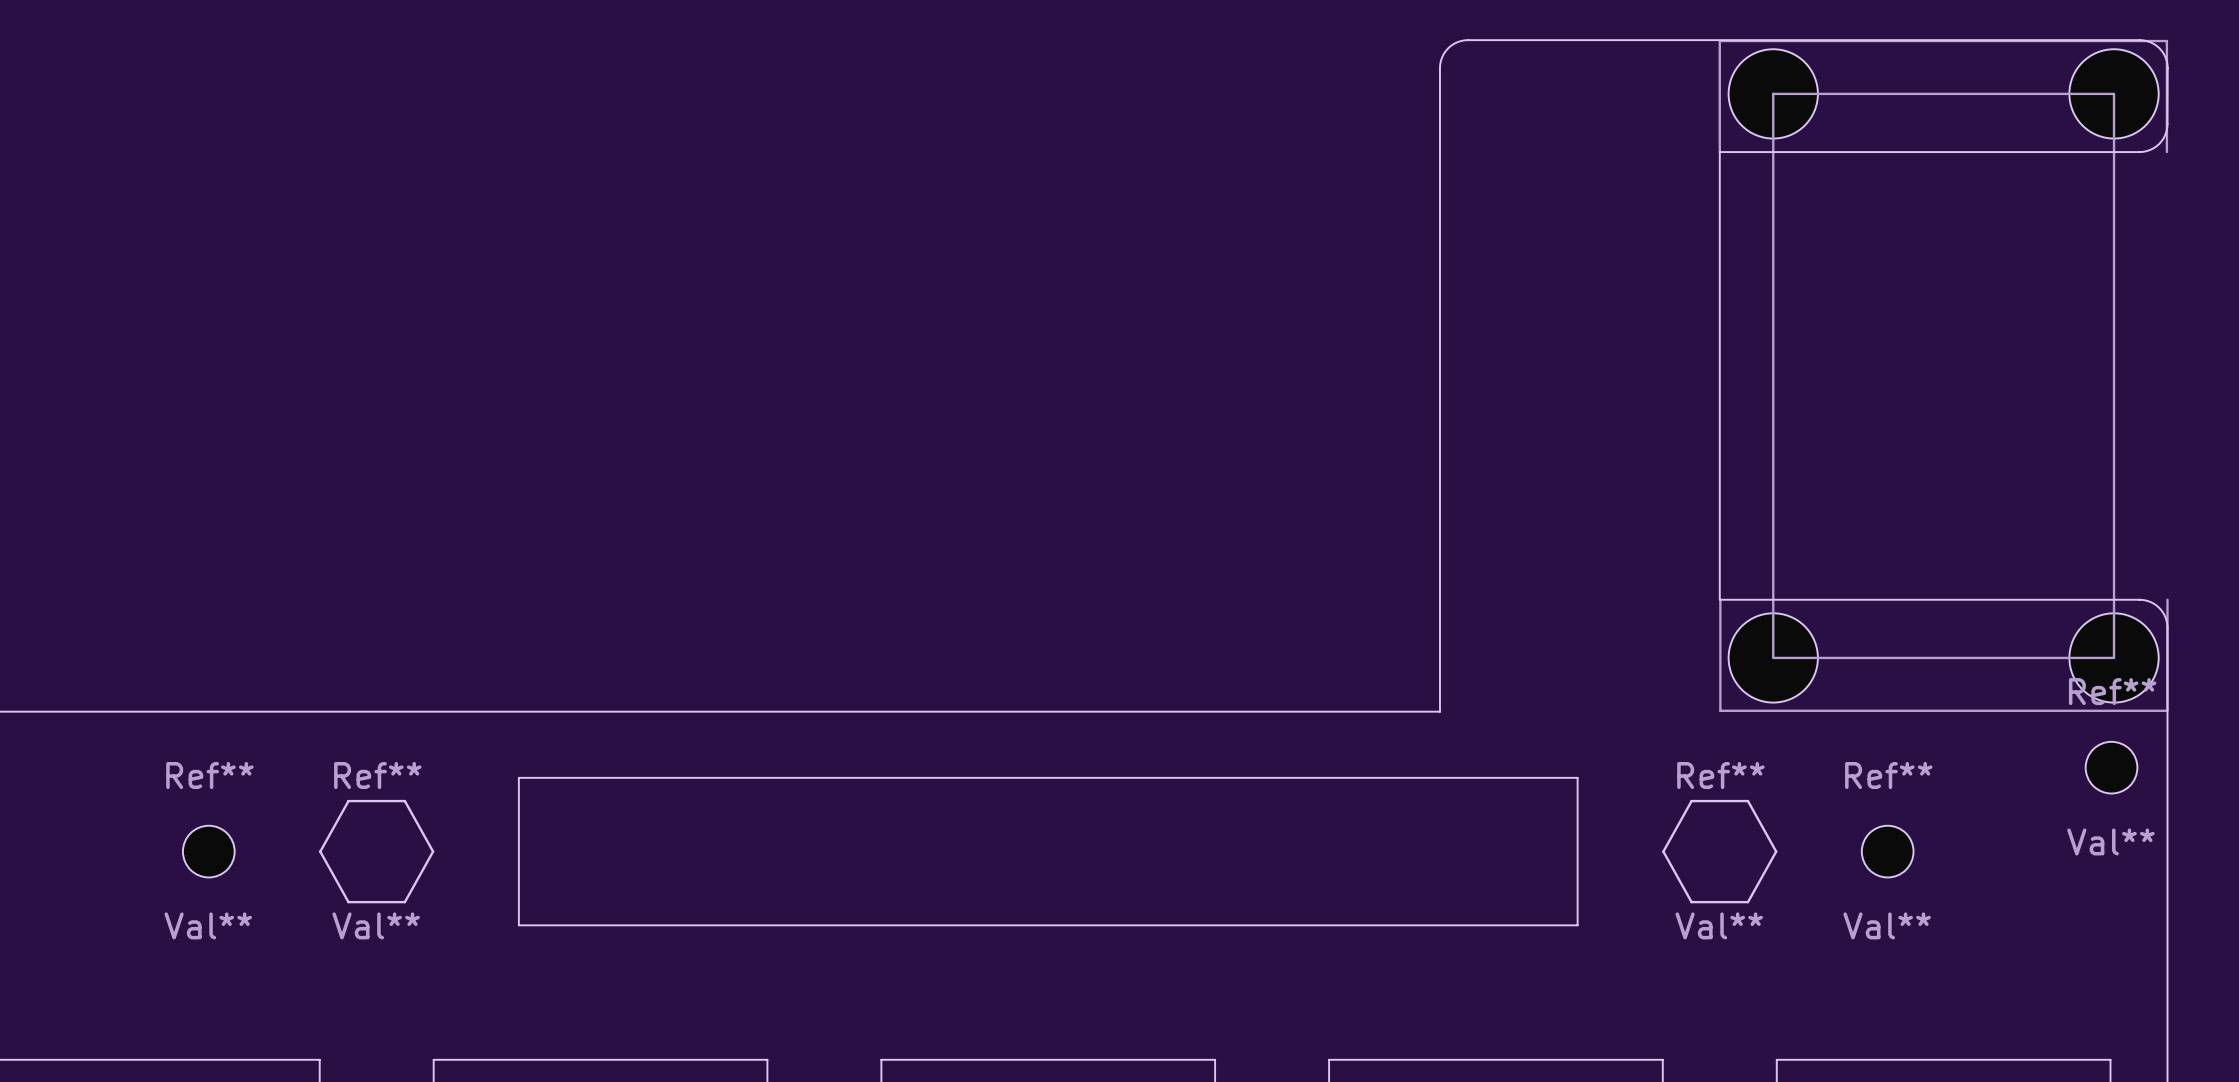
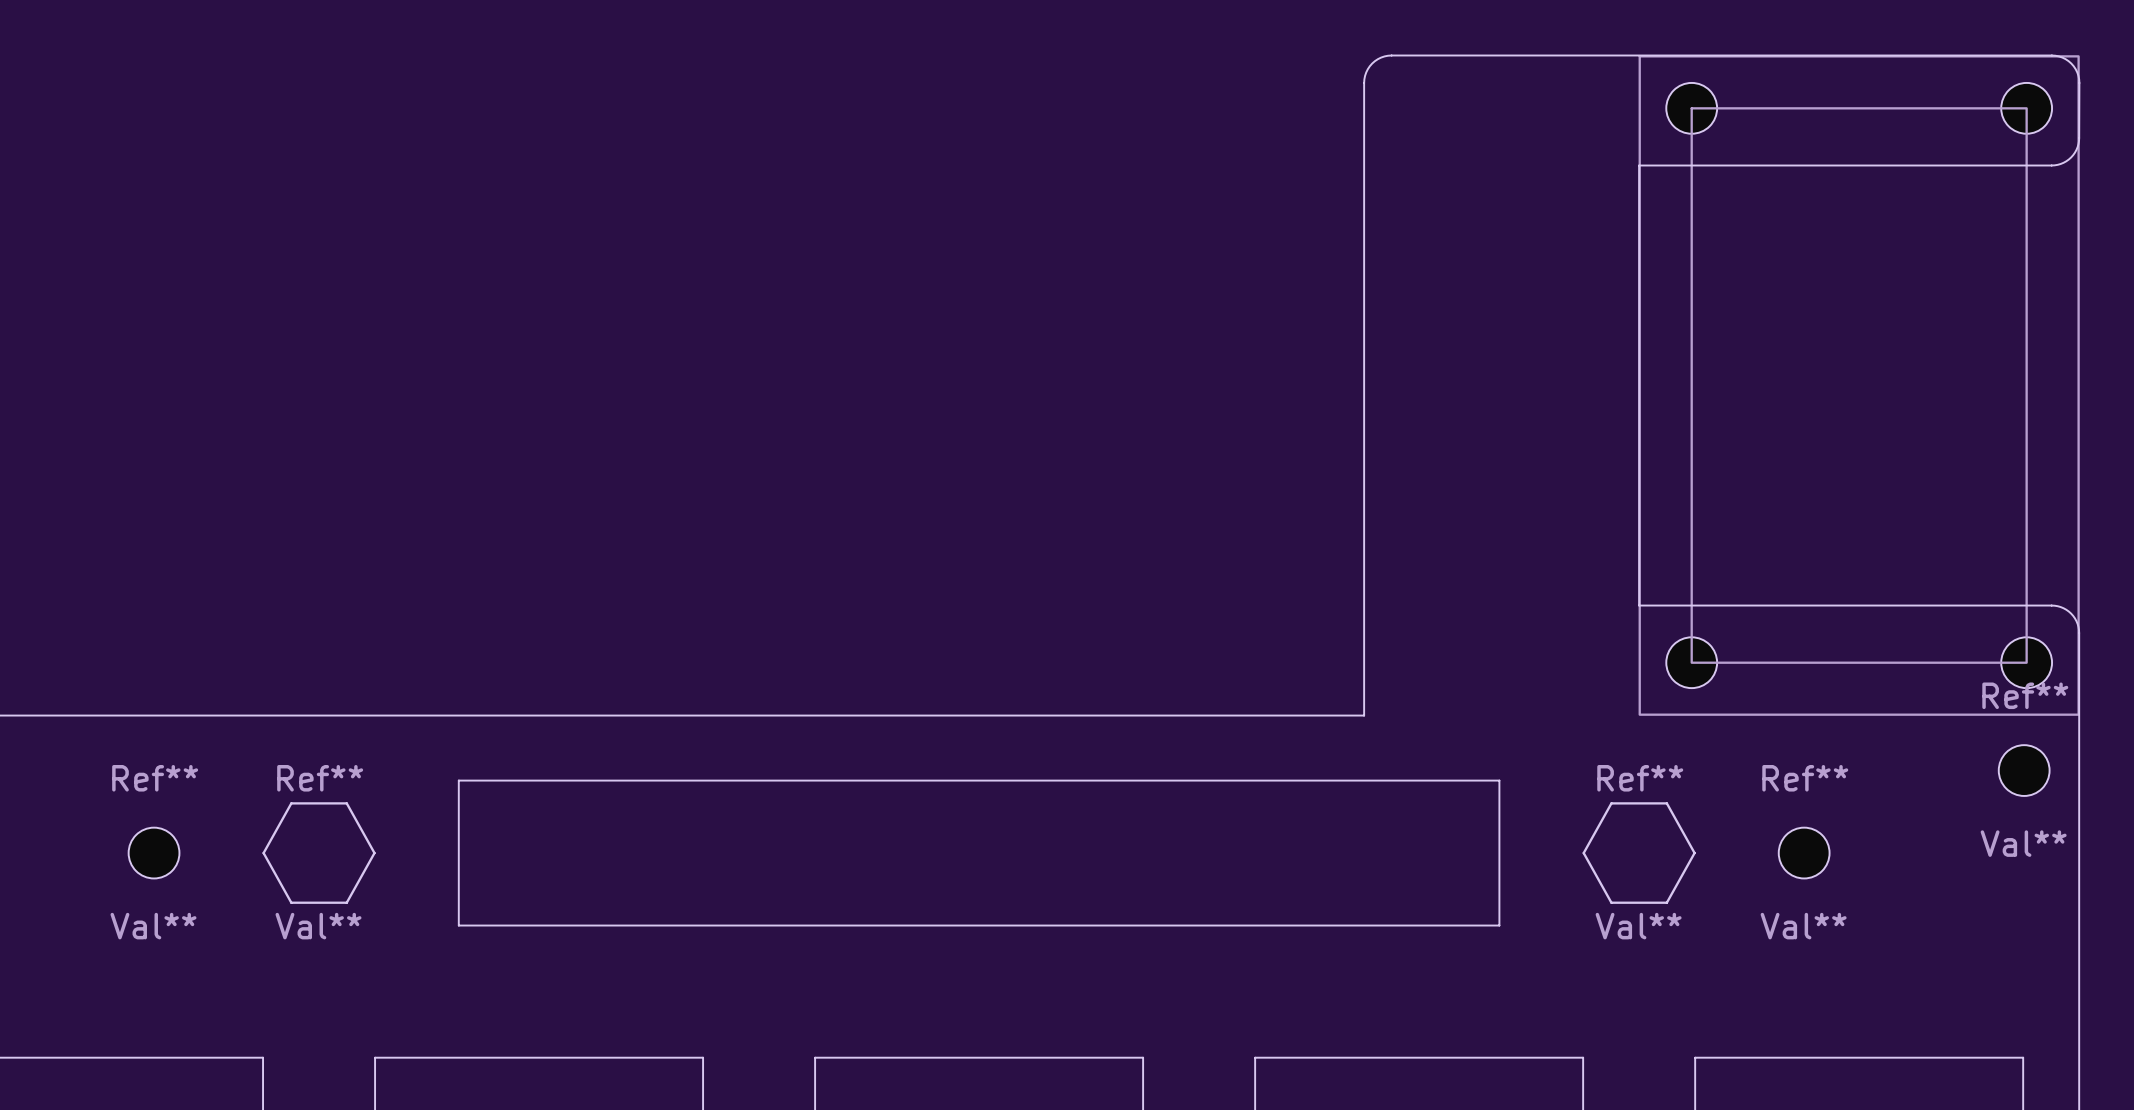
part footprint: [1718, 39, 2169, 712] -> [1638, 55, 2080, 716]

